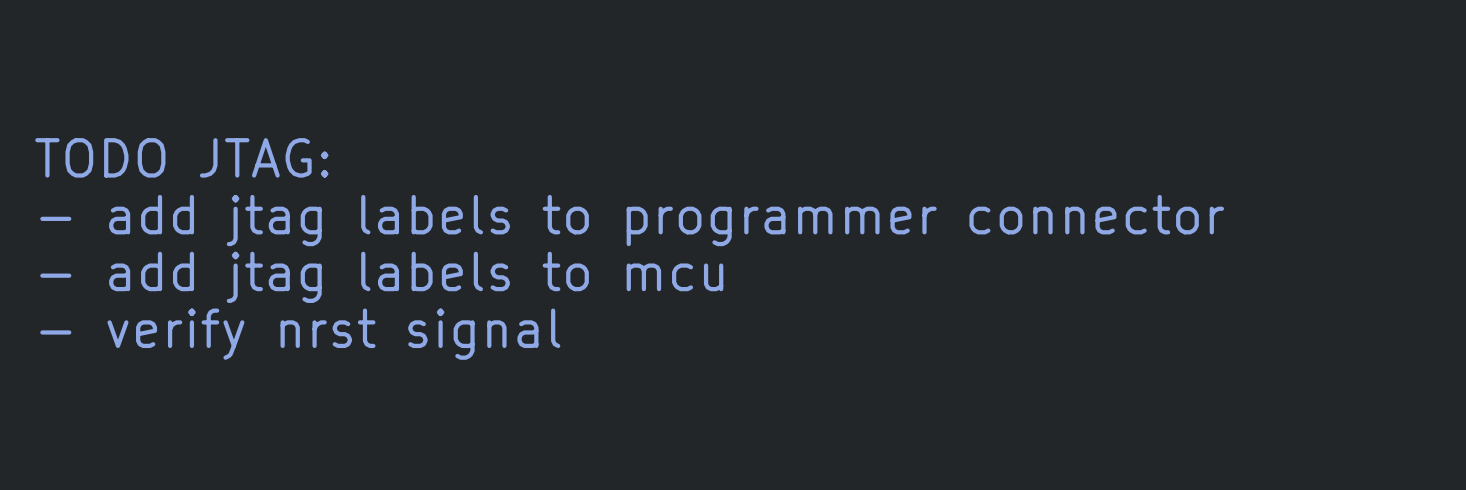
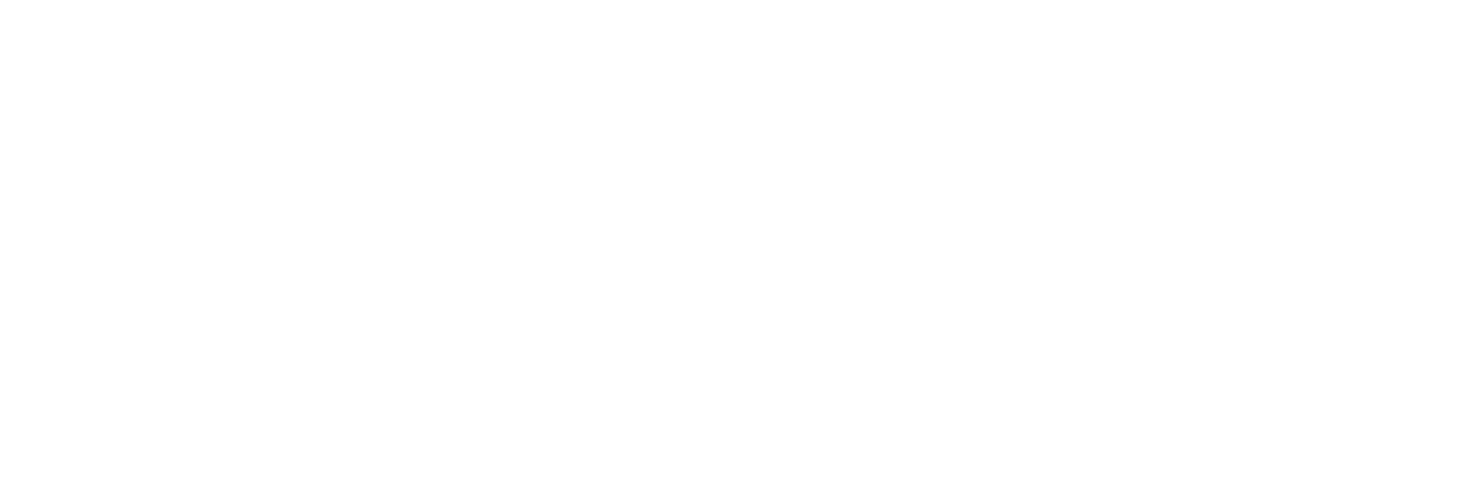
text: TODO JTAG: (181, 157) -> none
text: - add jtag labels to programmer connector (632, 220) -> none
text: - add jtag labels to mcu (381, 277) -> none
text: - verify nrst signal (300, 334) -> none

